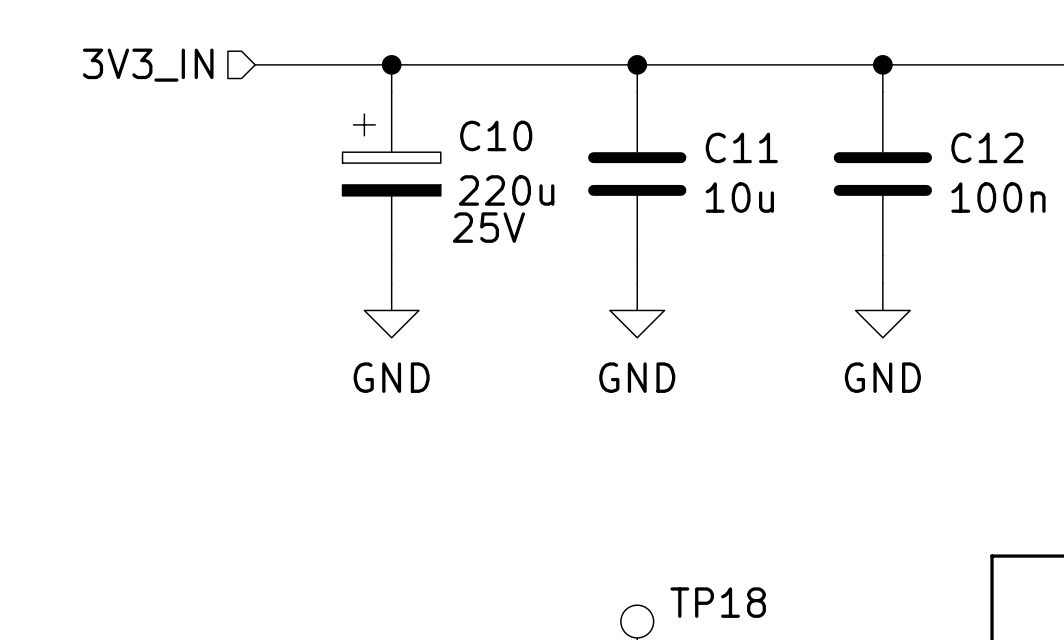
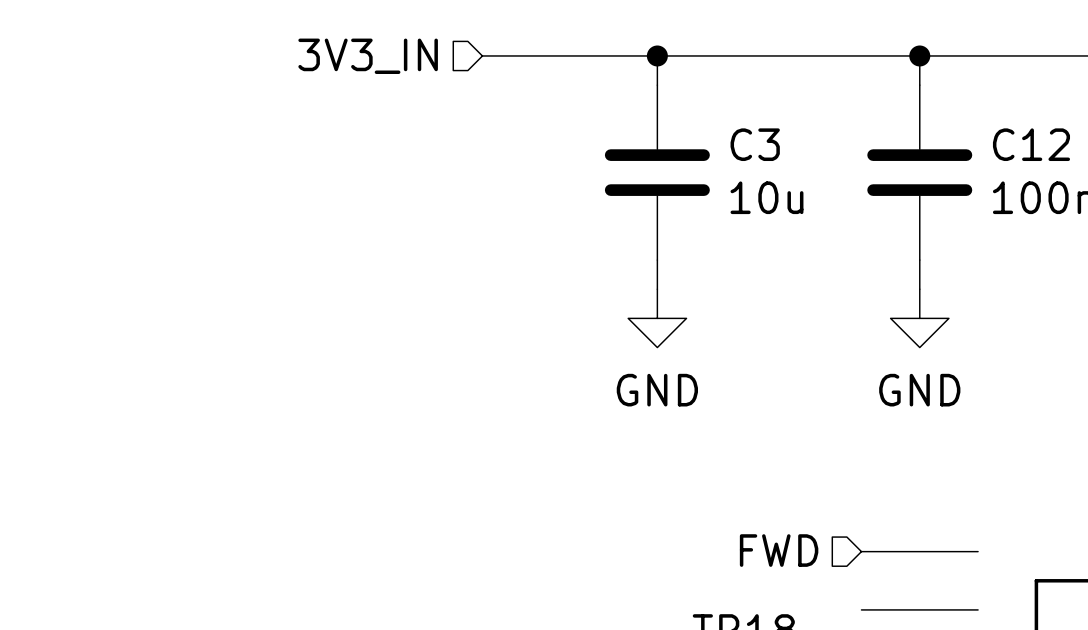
wire: (255, 64) (473, 64) -> none
wire: (391, 64) (391, 92) -> none
junction: (391, 64) -> none
hierarchical label position: 3V3_IN (148, 65) -> 3V3_IN (368, 56)
C11 name: C11 (741, 147) -> C3 (755, 144)
C10: 220u (391, 174) -> none
wire: (391, 255) (391, 283) -> none
power symbol: GND (391, 310) -> none
hierarchical label: none -> FWD (779, 550)
wire: none -> (861, 551) (978, 551)
wire: none -> (861, 609) (978, 609)

